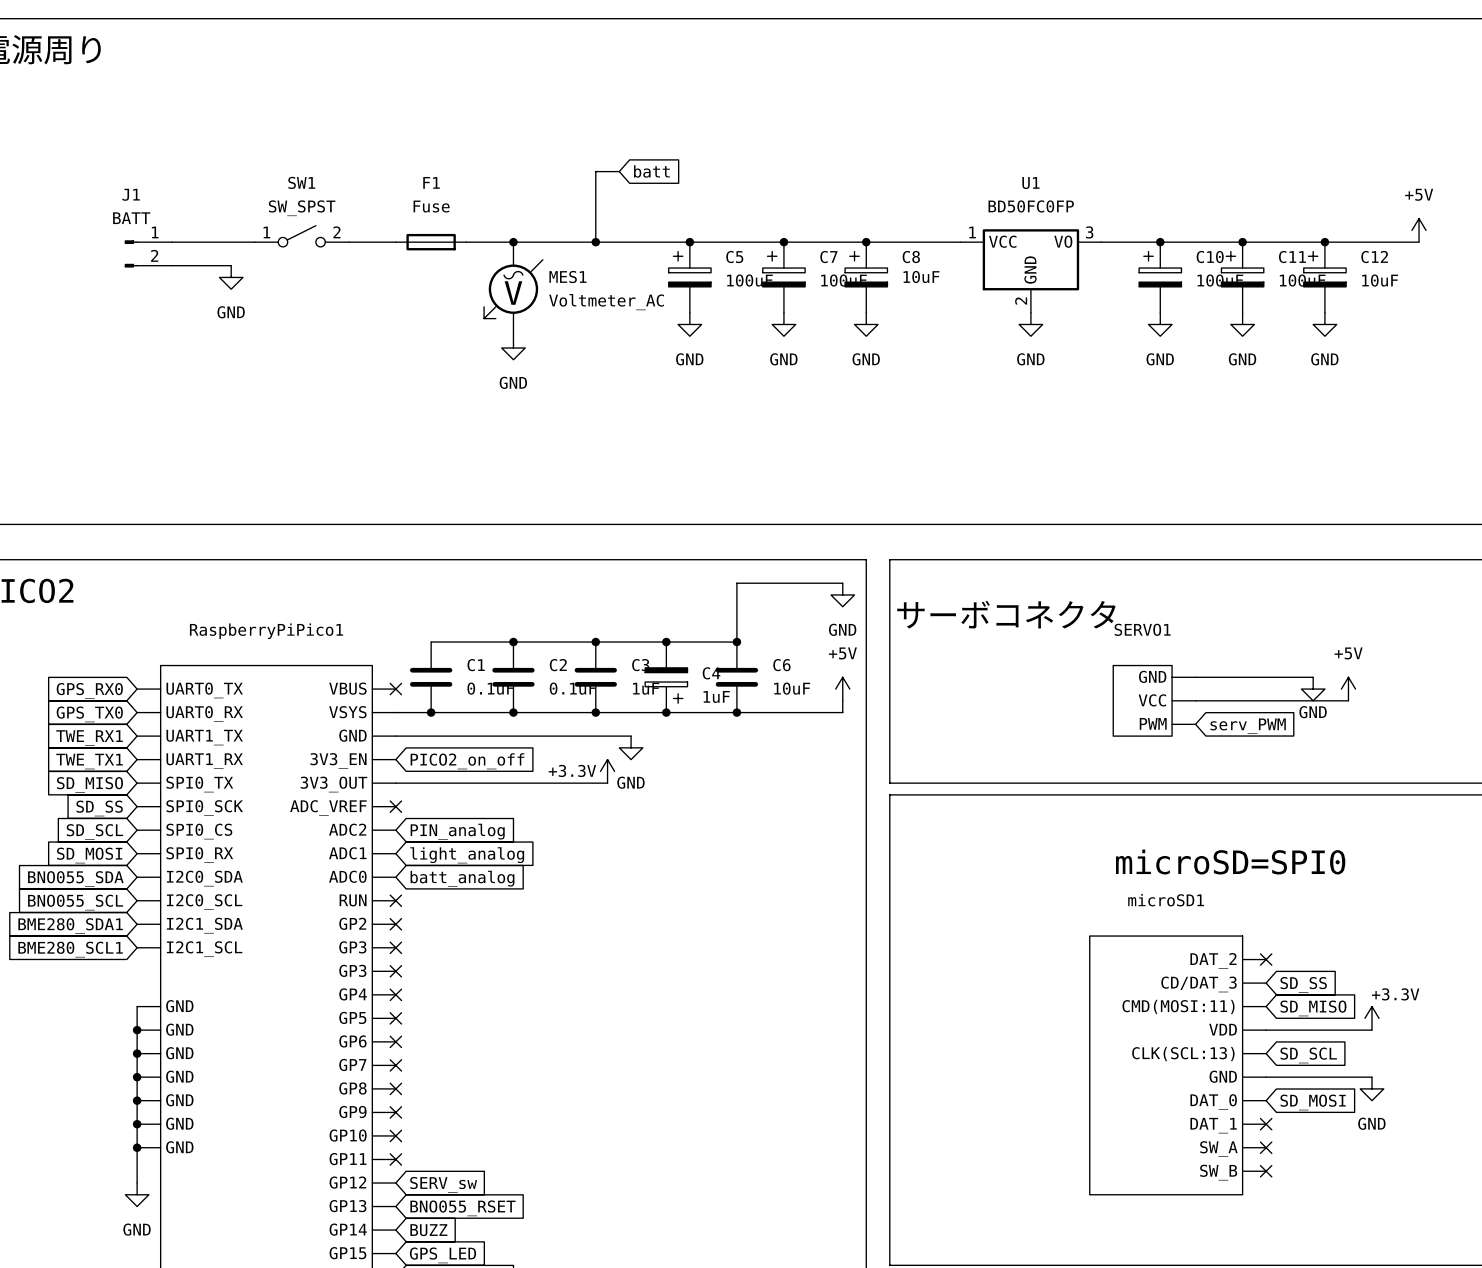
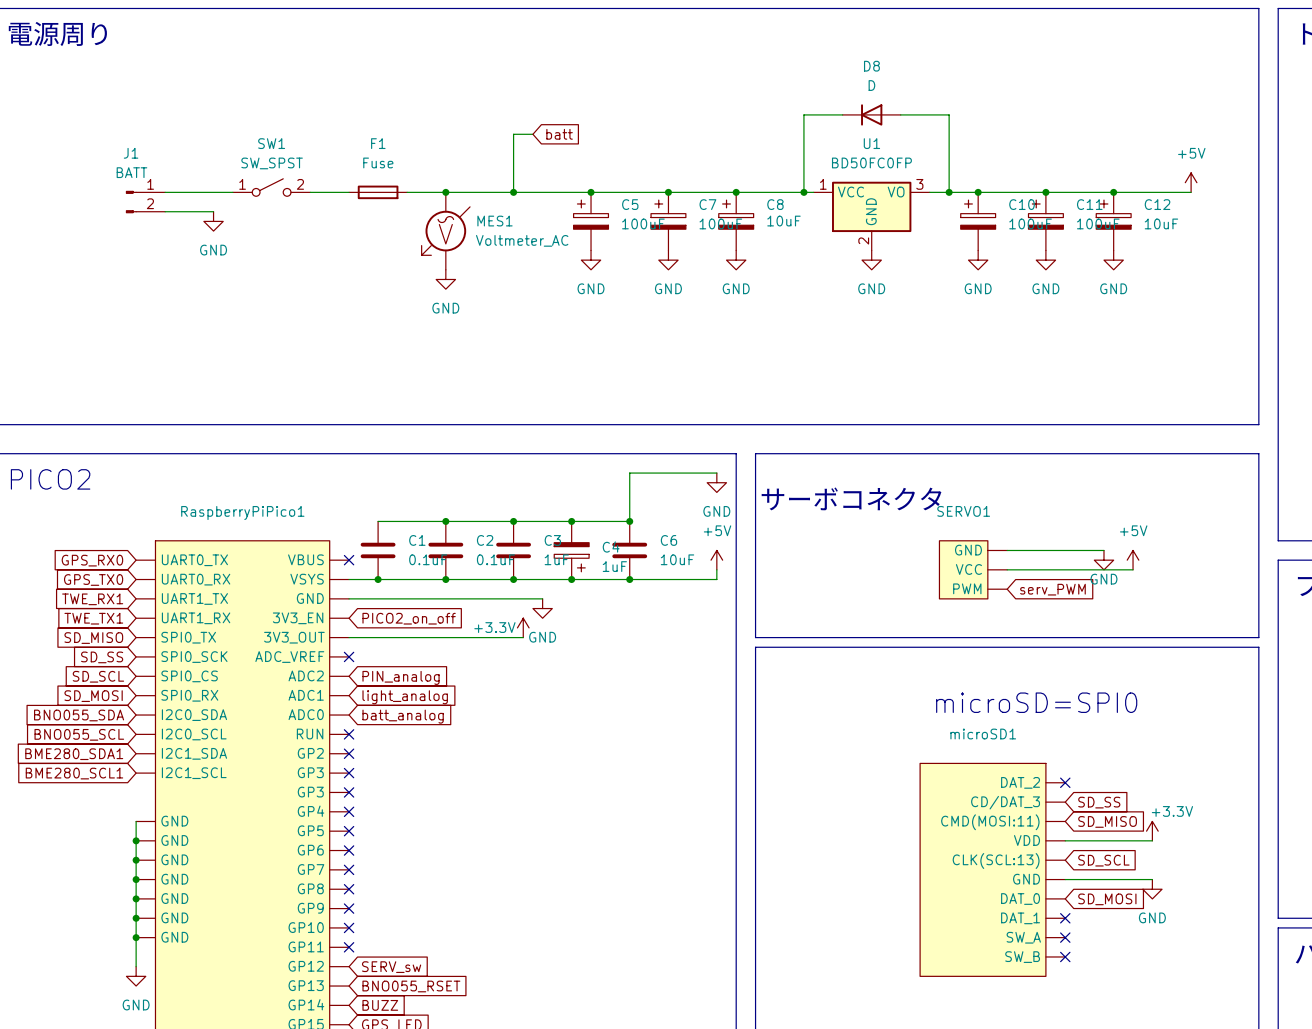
wire: none -> (842, 114) (803, 114) (803, 192)
D8: none -> D (871, 114)
wire: none -> (900, 114) (949, 114) (949, 192)
junction: none -> (803, 192)
junction: none -> (949, 192)

